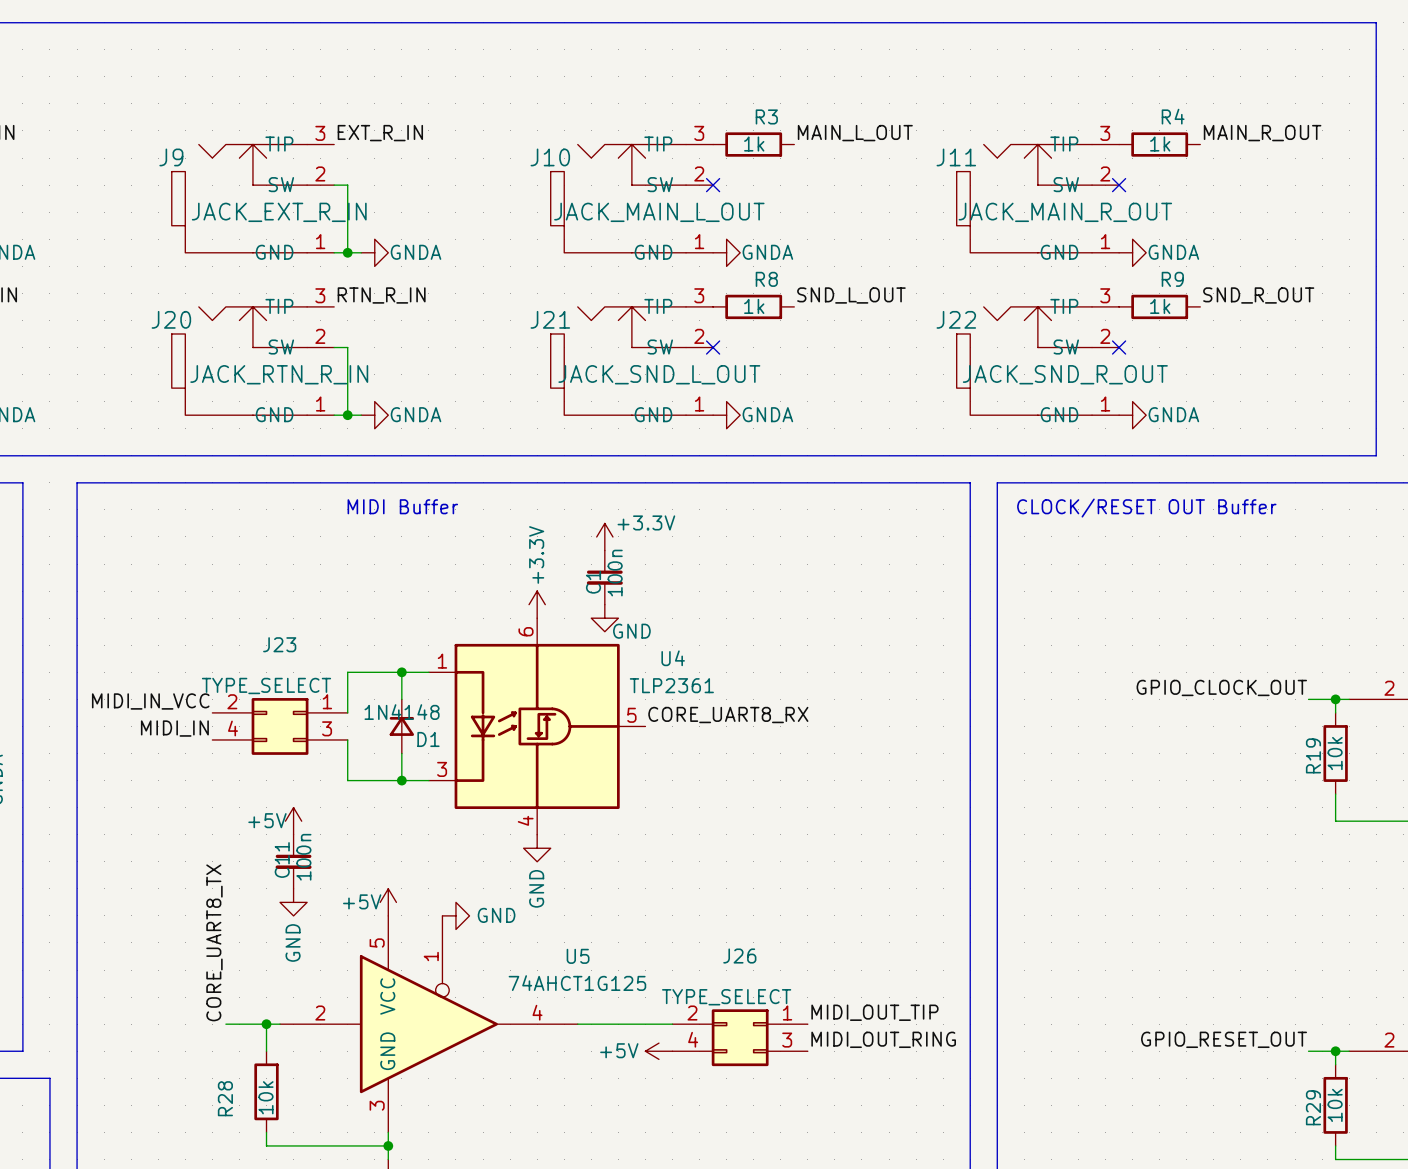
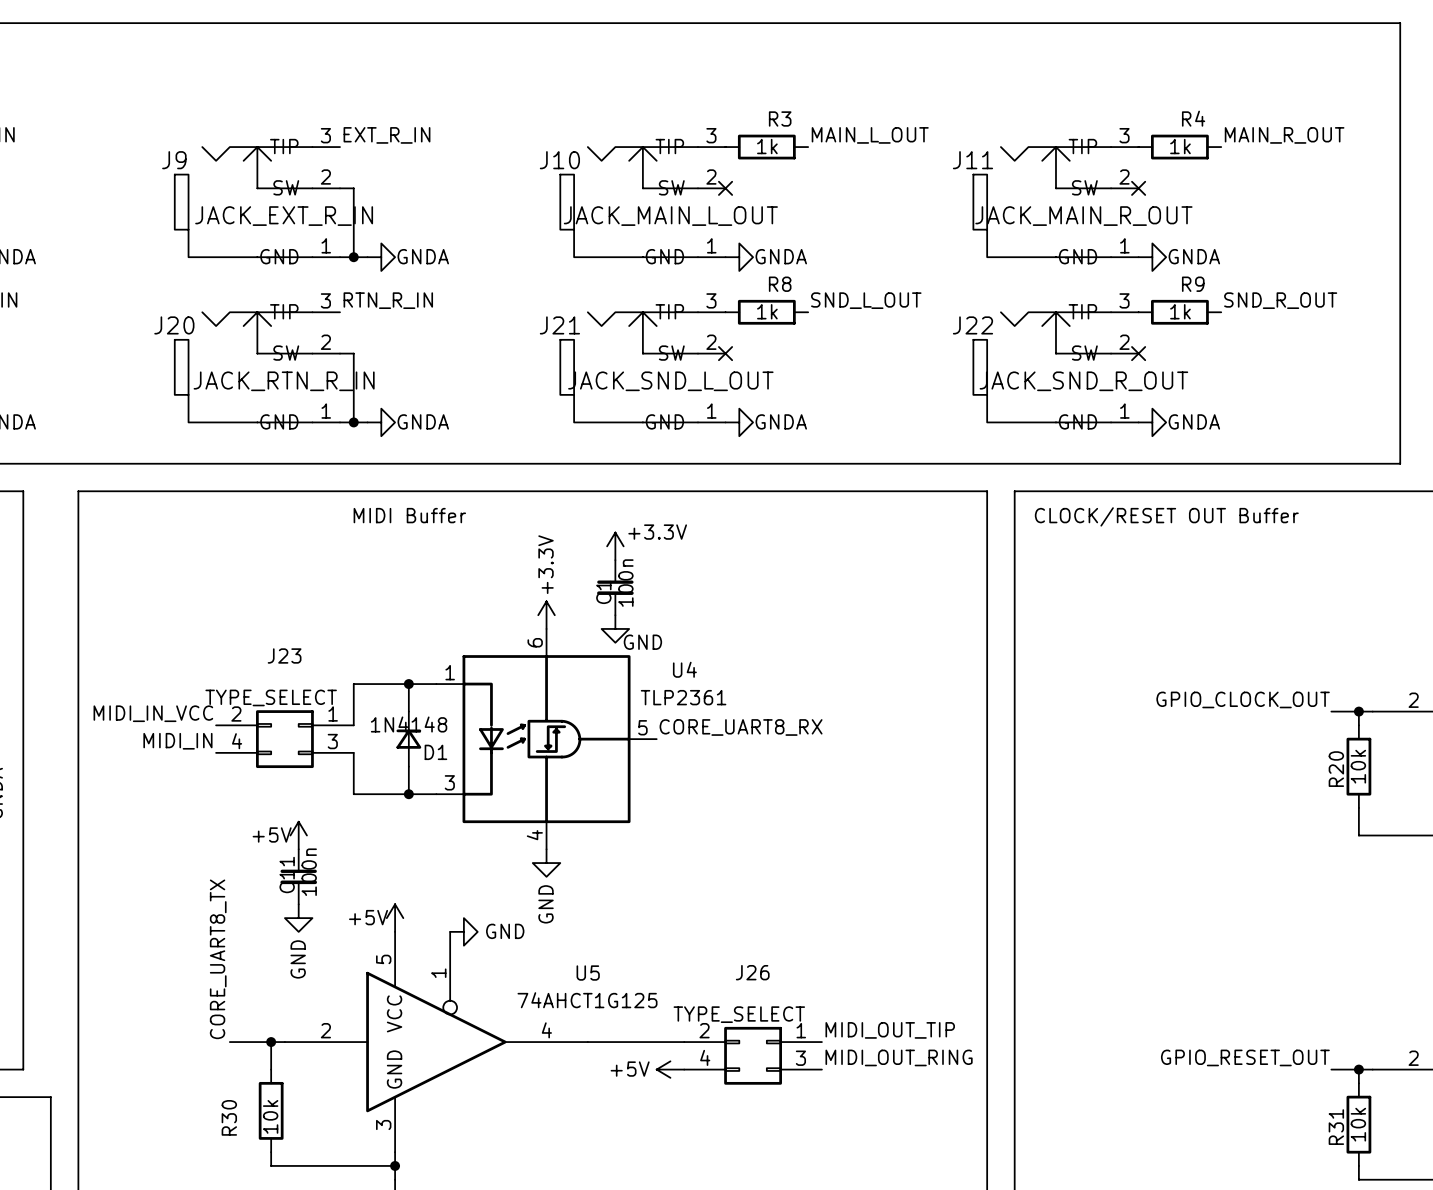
R19 name: R19 (1313, 755) -> R20 (1336, 769)
R28 name: R28 (225, 1098) -> R30 (229, 1117)
R29 name: R29 (1313, 1107) -> R31 (1336, 1127)

